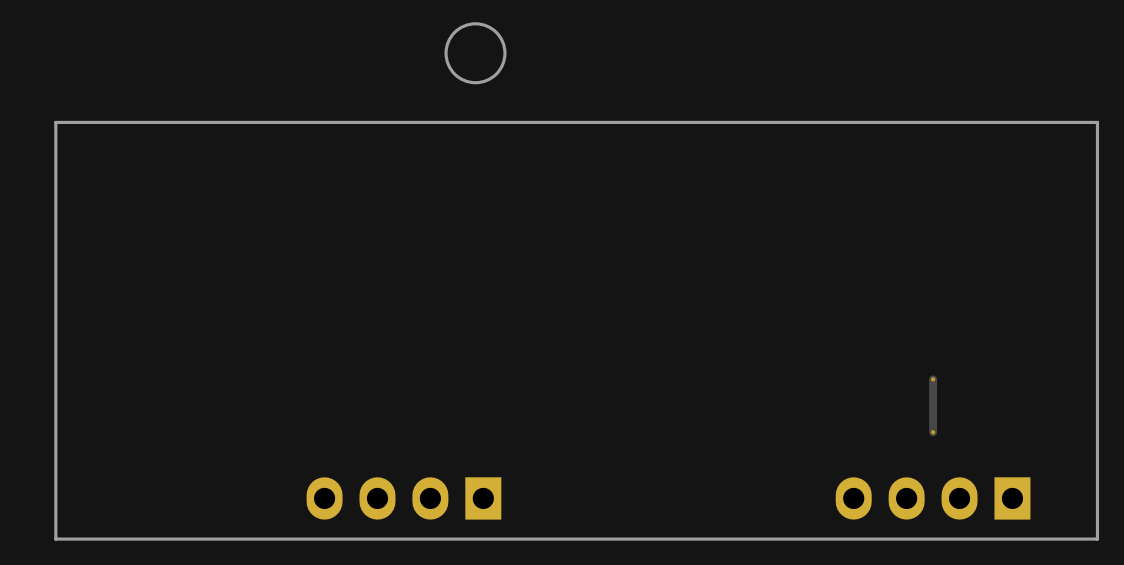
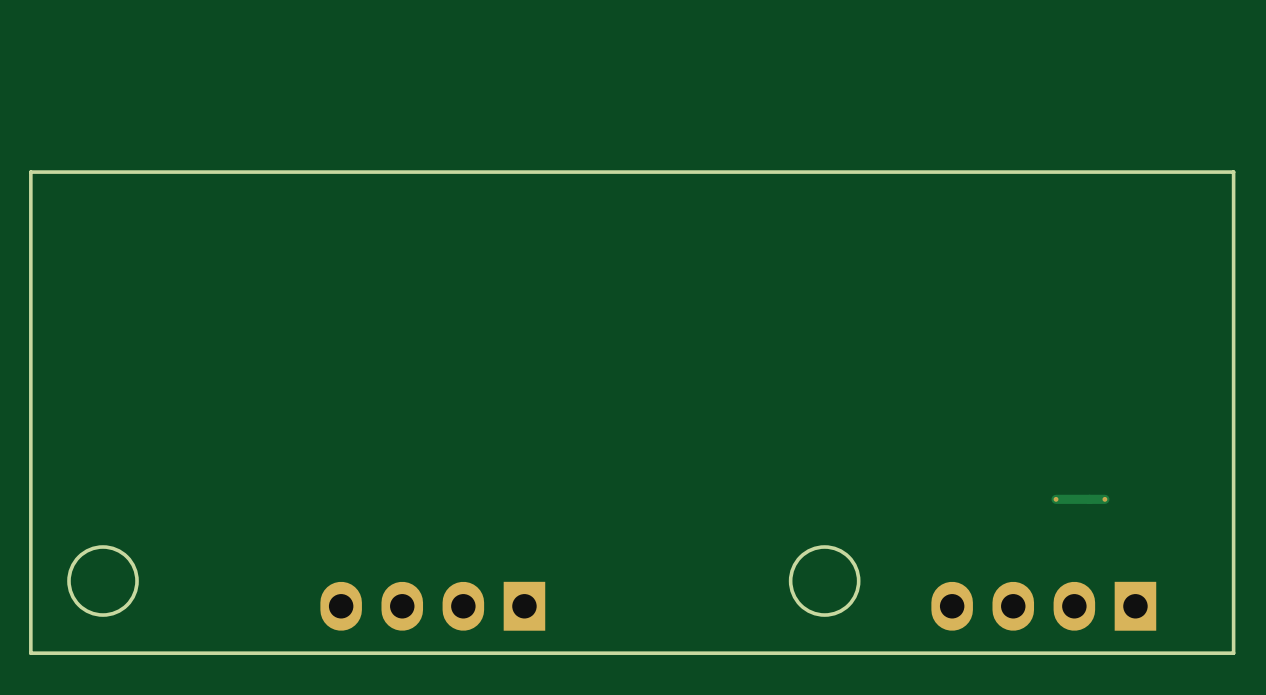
round board edge: [444, 22, 507, 85] -> none
track: (933, 379) (933, 432) -> none
via: (933, 379) -> none
via: none -> (1056, 499)
track: none -> (1104, 499) (1056, 499)
via: none -> (1104, 499)
via: (933, 432) -> none
round board edge: none -> [67, 545, 139, 617]
round board edge: none -> [788, 545, 861, 617]

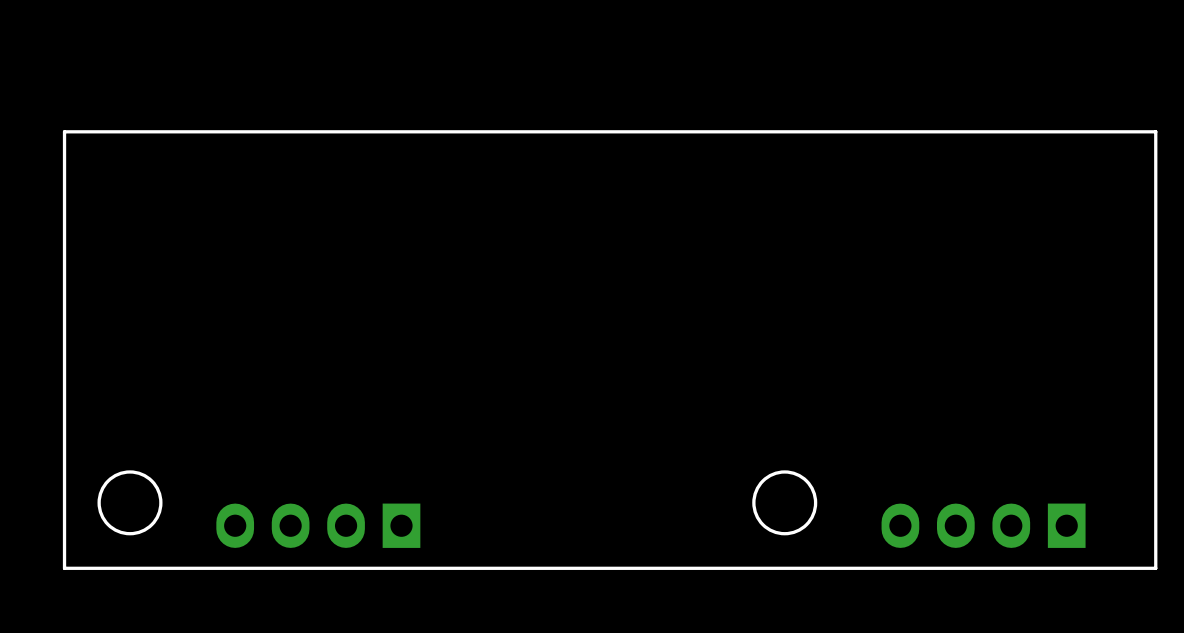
via: (1056, 499) -> none
track: (1104, 499) (1056, 499) -> none
via: (1104, 499) -> none
part position: (432, 606) -> (318, 525)

